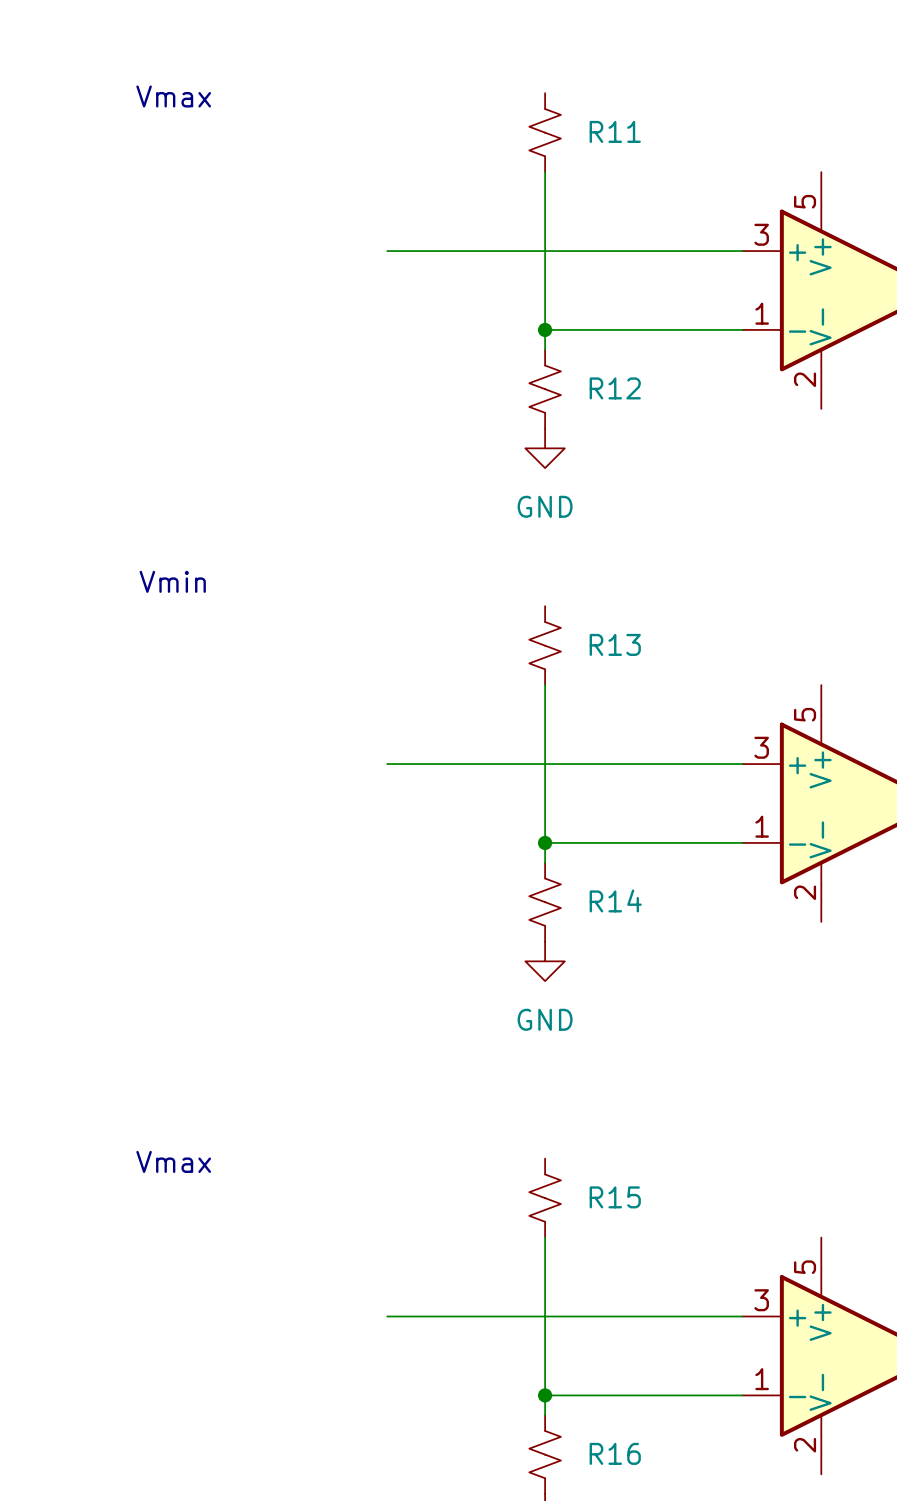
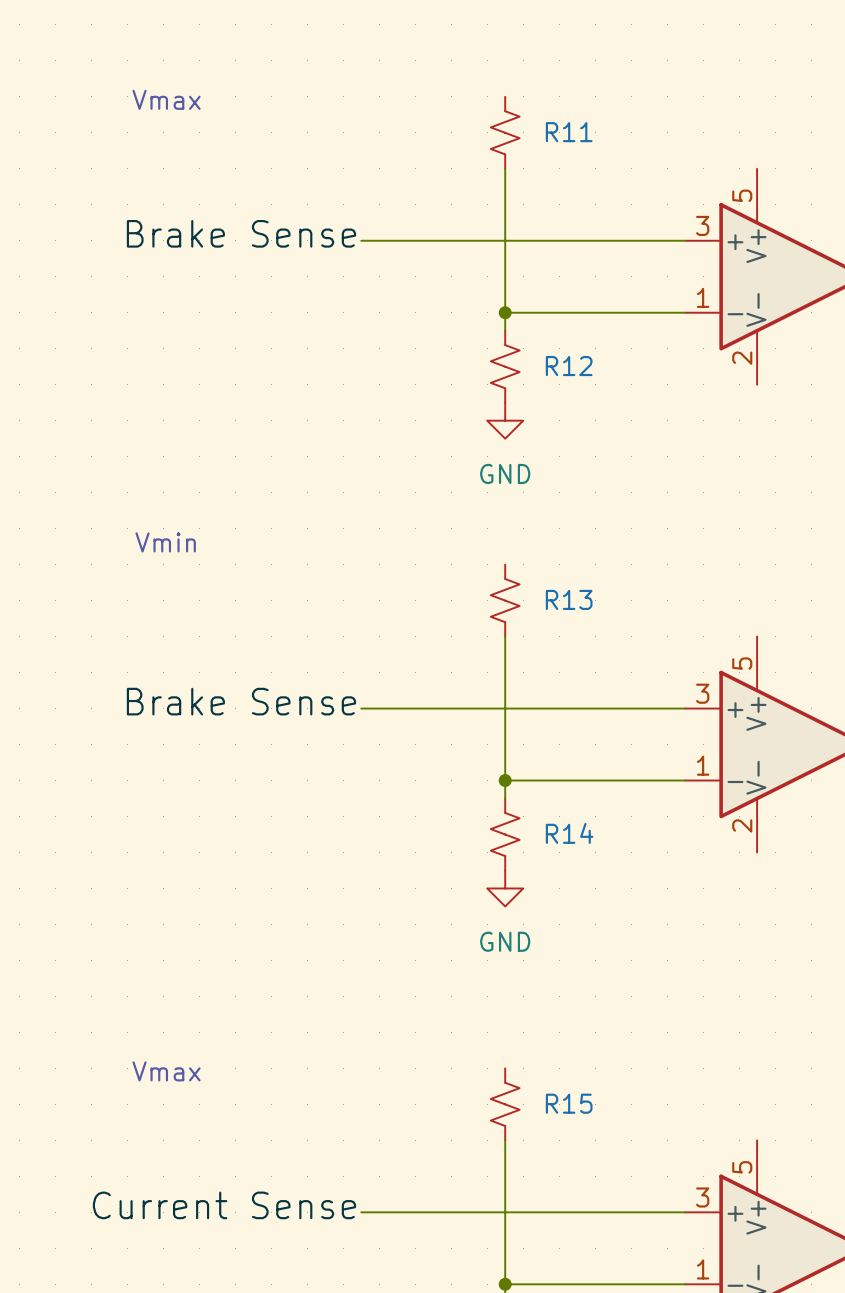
label: none -> Brake Sense (241, 233)
label: none -> Brake Sense (241, 701)
label: none -> Current Sense (224, 1205)

